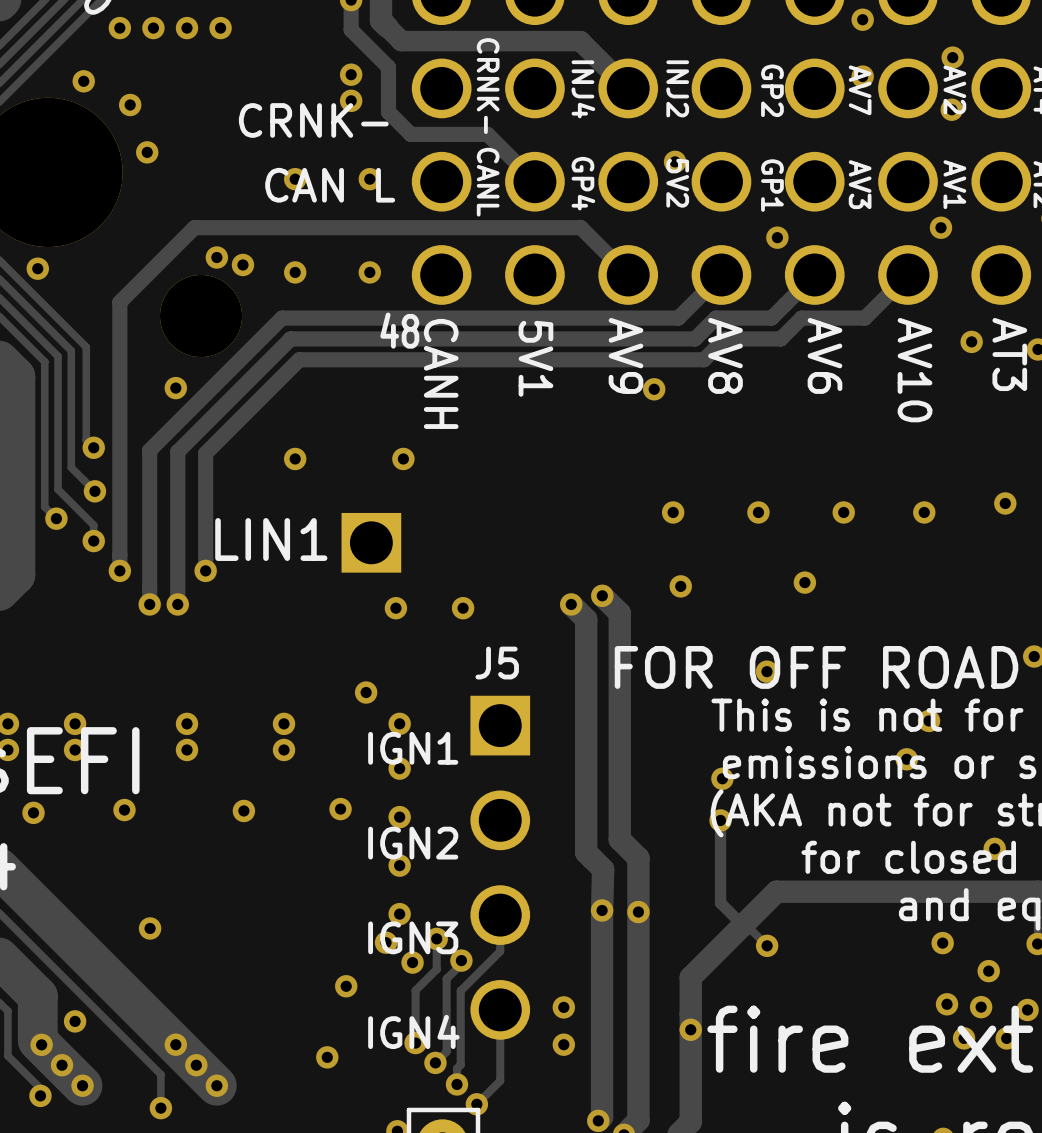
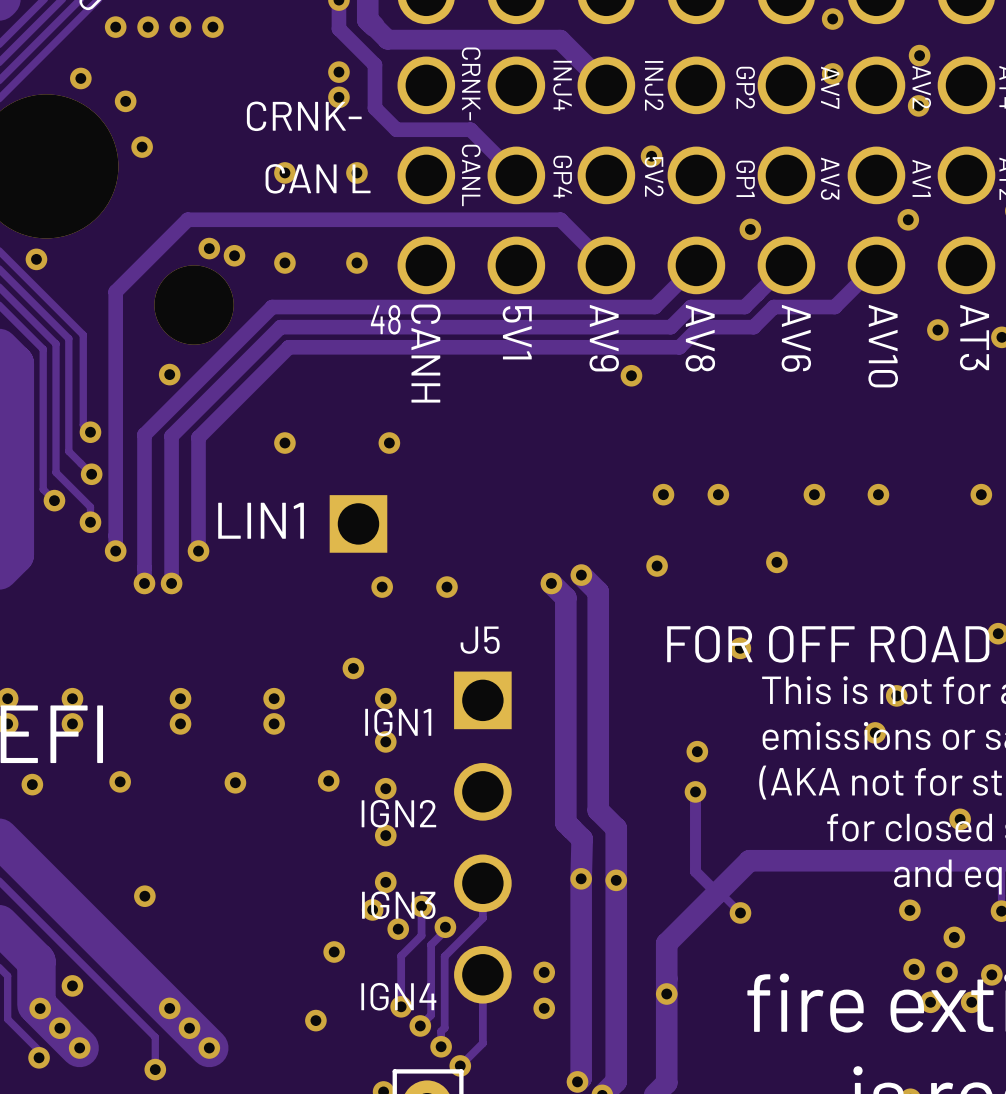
via position: (1005, 503) -> (981, 494)
via position: (673, 512) -> (663, 494)
via position: (758, 512) -> (718, 494)
via position: (924, 512) -> (878, 494)

